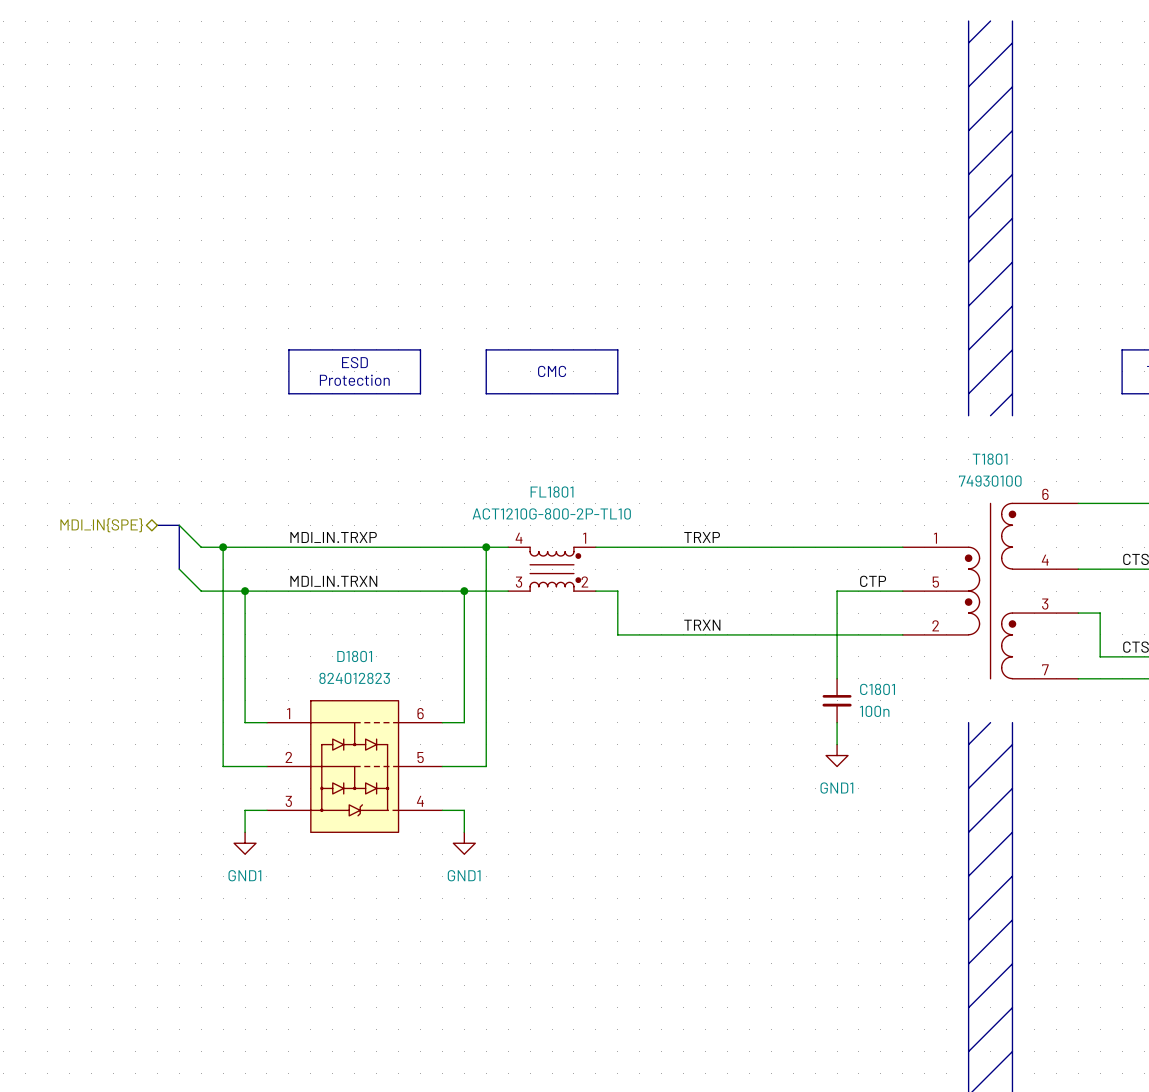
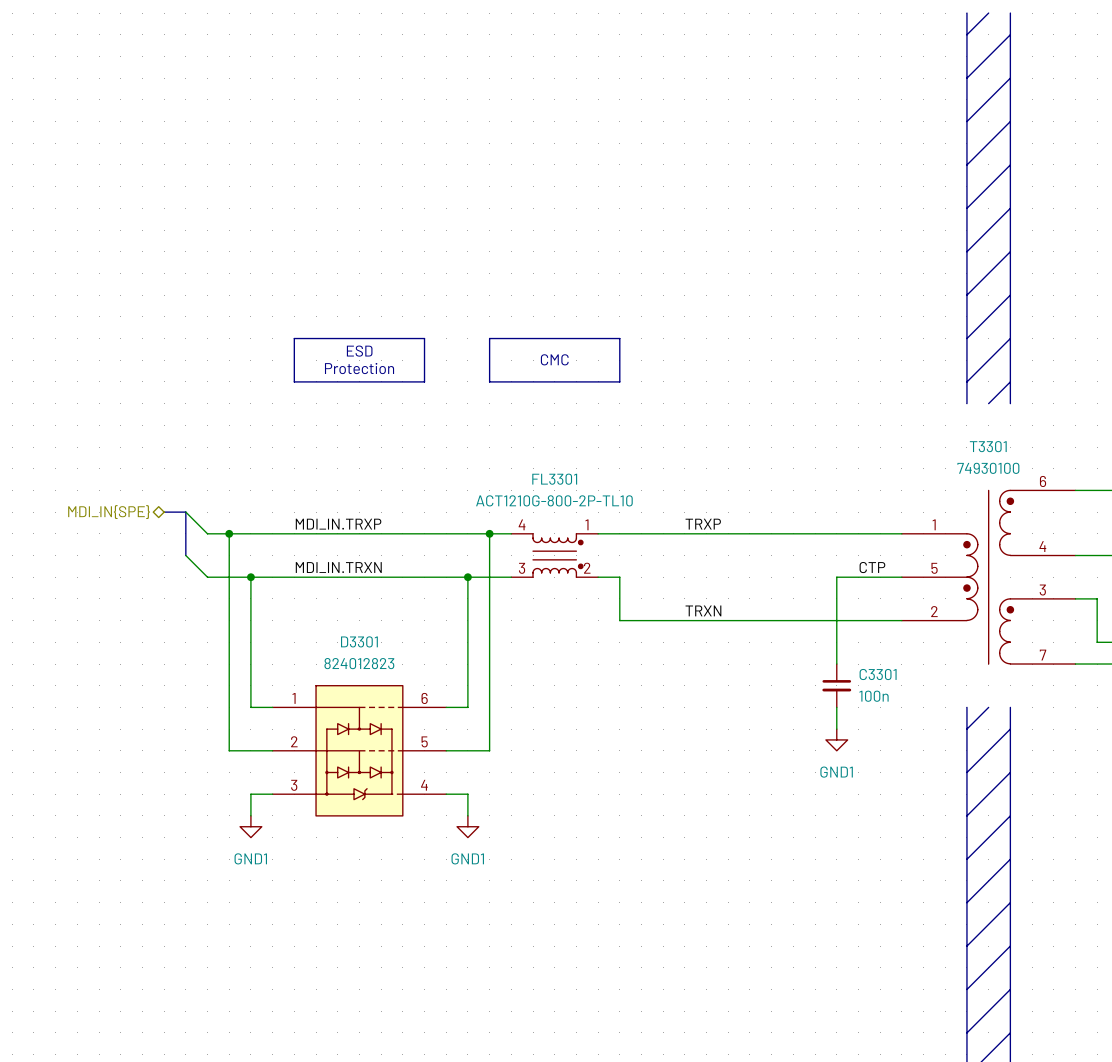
T1801 name: T1801 (990, 459) -> T3301 (988, 446)
FL1801 name: FL1801 (552, 492) -> FL3301 (554, 479)
D1801 name: D1801 (354, 656) -> D3301 (359, 641)
C1801 name: C1801 (877, 689) -> C3301 (878, 674)

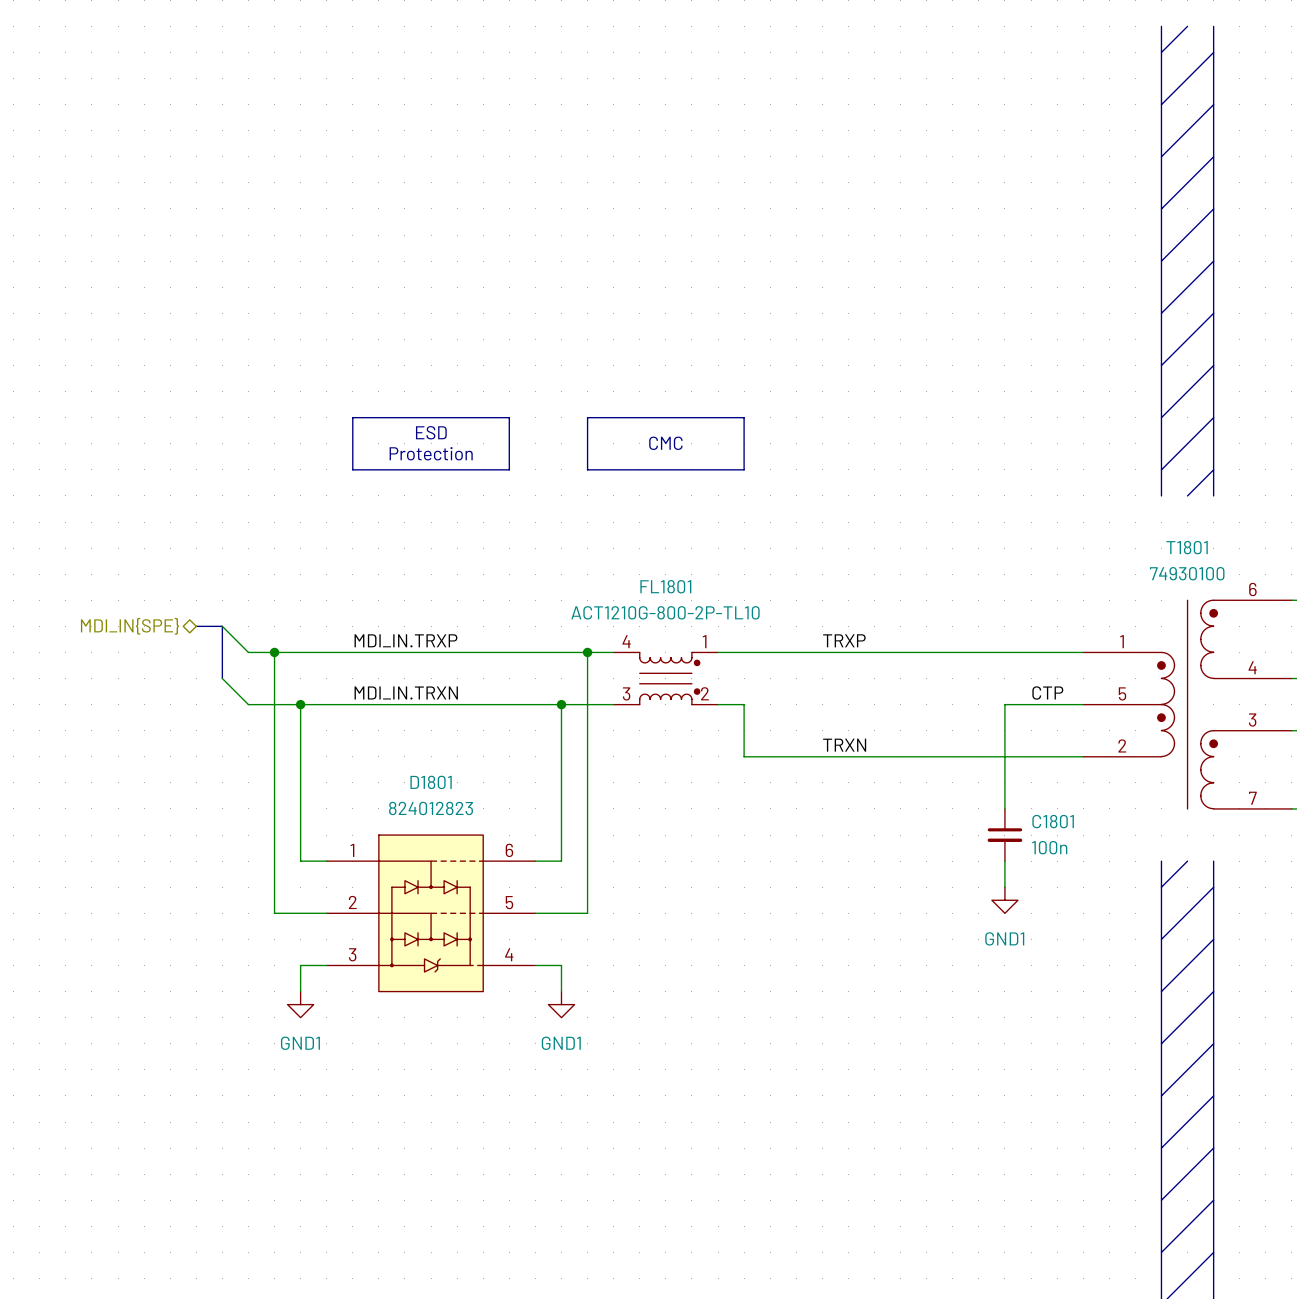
T3301 name: T3301 (988, 446) -> T1801 (1187, 547)
FL3301 name: FL3301 (554, 479) -> FL1801 (665, 586)
D3301 name: D3301 (359, 641) -> D1801 (431, 782)
C3301 name: C3301 (878, 674) -> C1801 (1053, 821)

